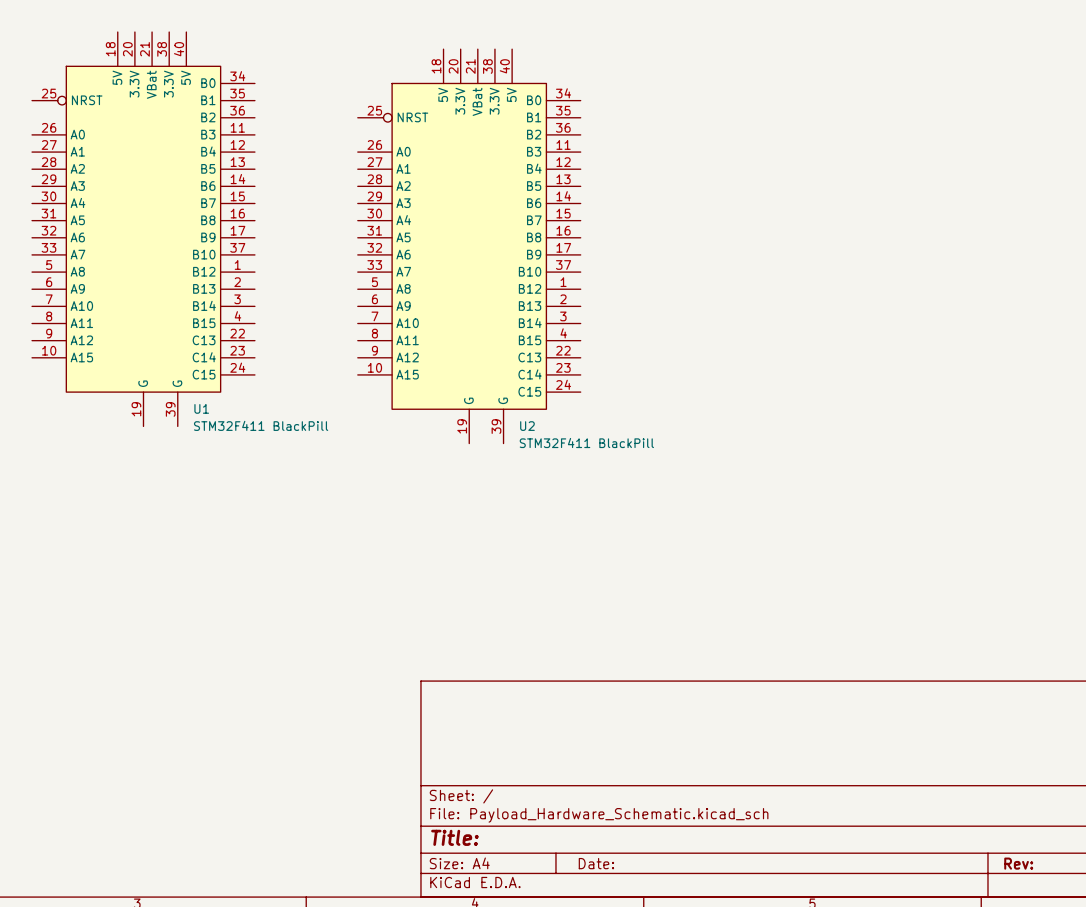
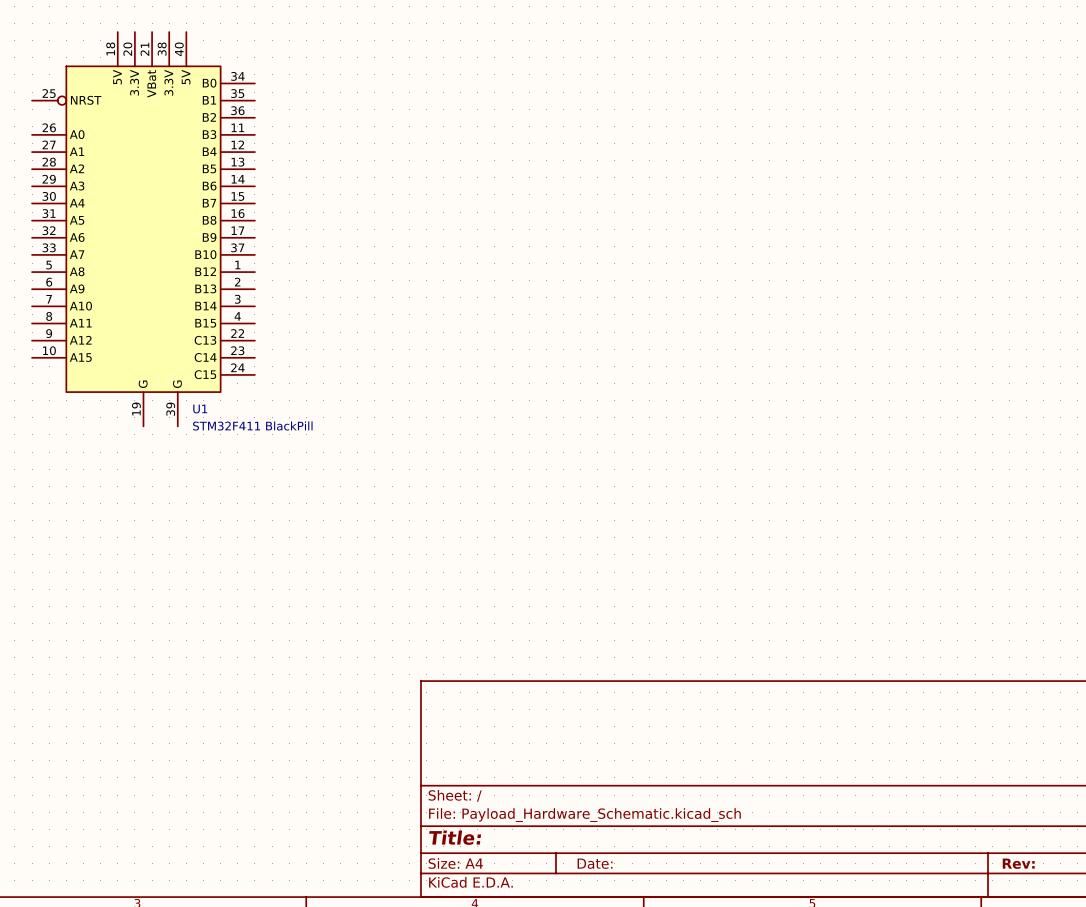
U2: STM32F411 BlackPill (469, 246) -> none

